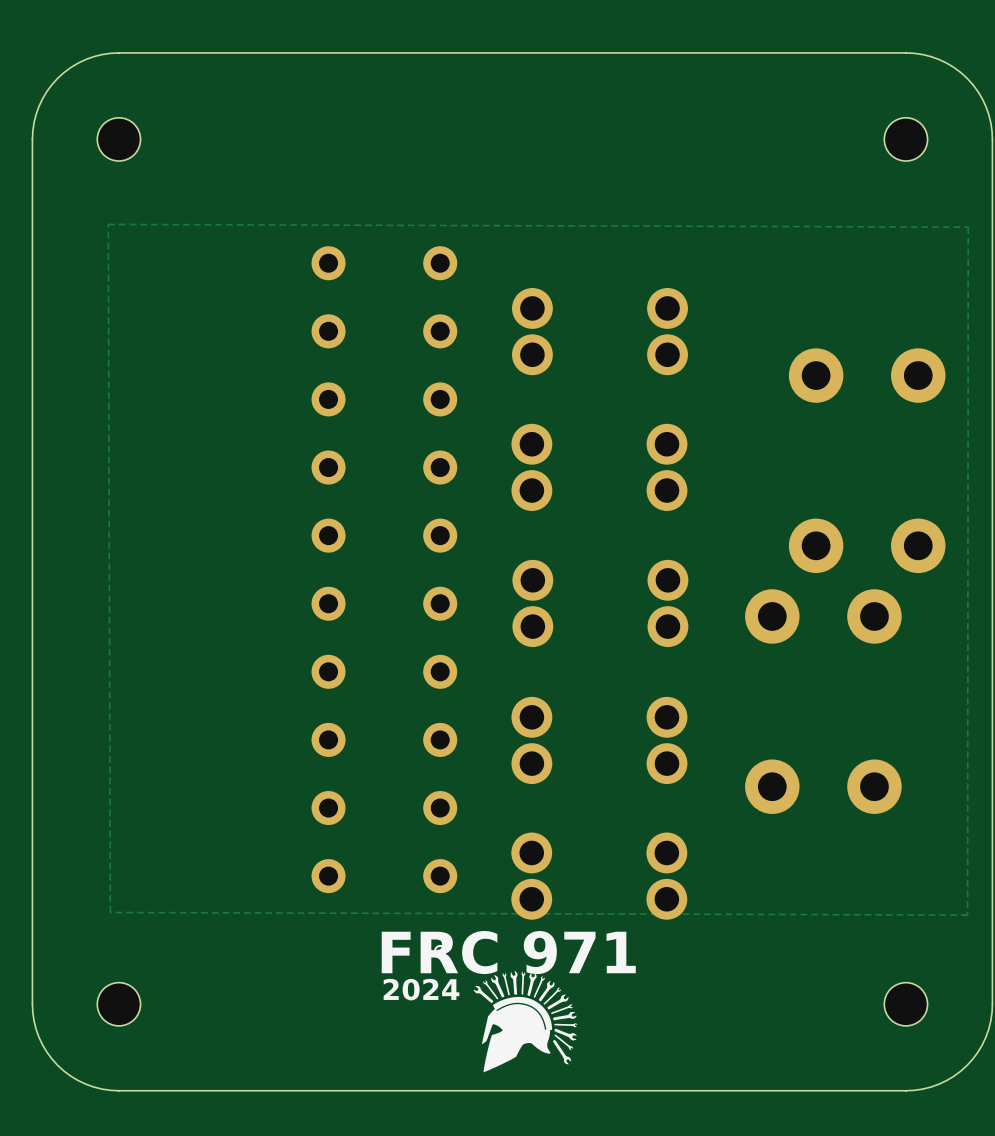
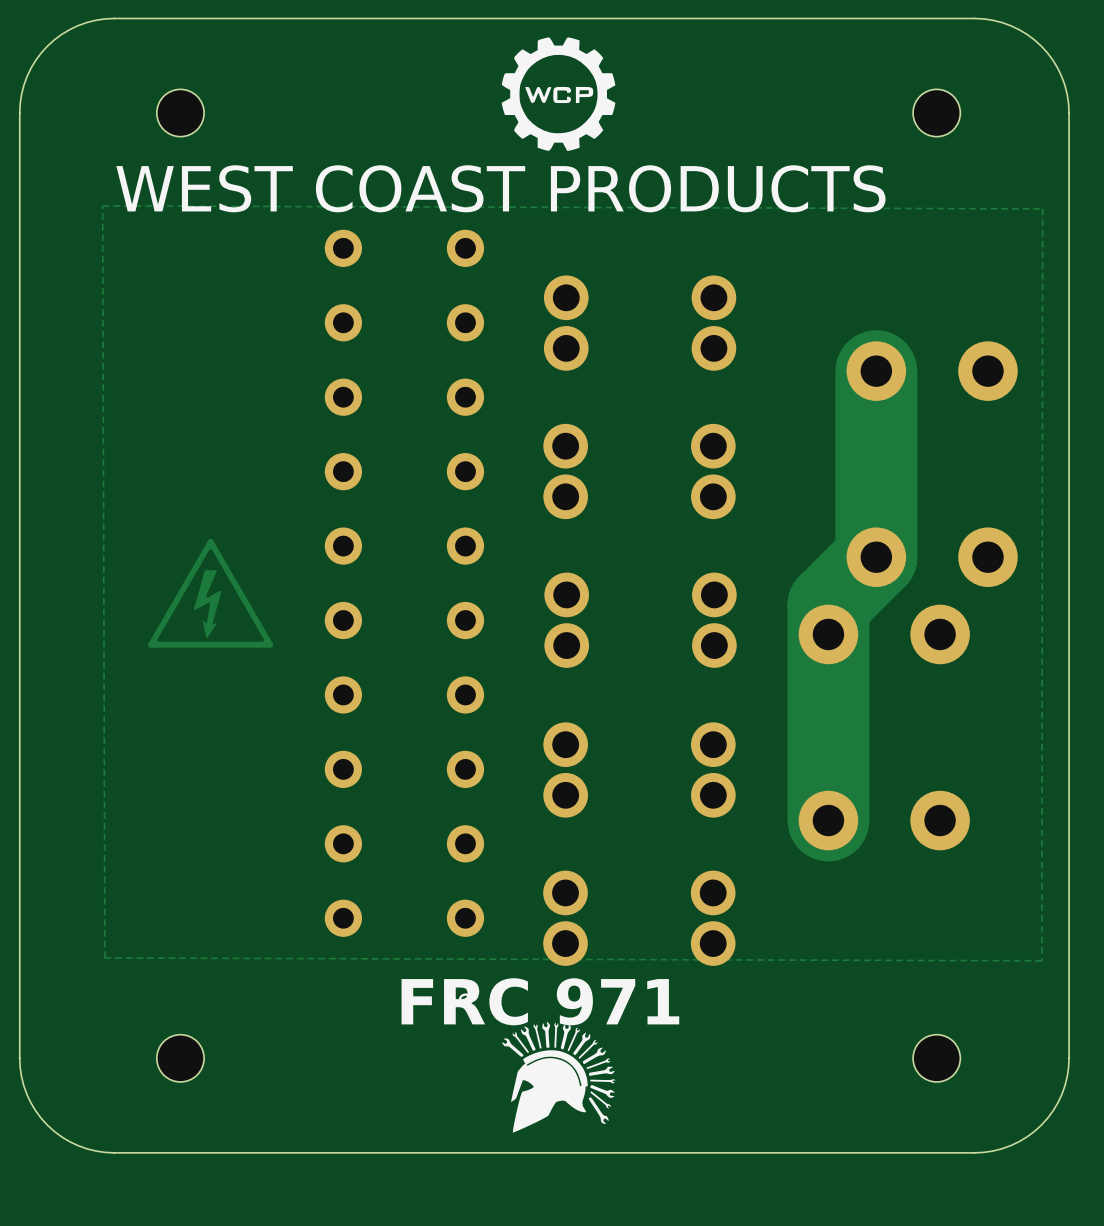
drawing: none -> [501, 37, 616, 151]
part position: (118, 139) -> (180, 113)
part position: (905, 139) -> (936, 113)
text: none -> WEST COAST PRODUCTS (500, 188)
track: none -> (876, 371) (876, 557) (828, 605) (828, 820)
drawing: none -> [148, 538, 274, 648]
text: 2024 (421, 989) -> none
part position: (118, 1004) -> (180, 1058)
part position: (905, 1004) -> (936, 1058)

